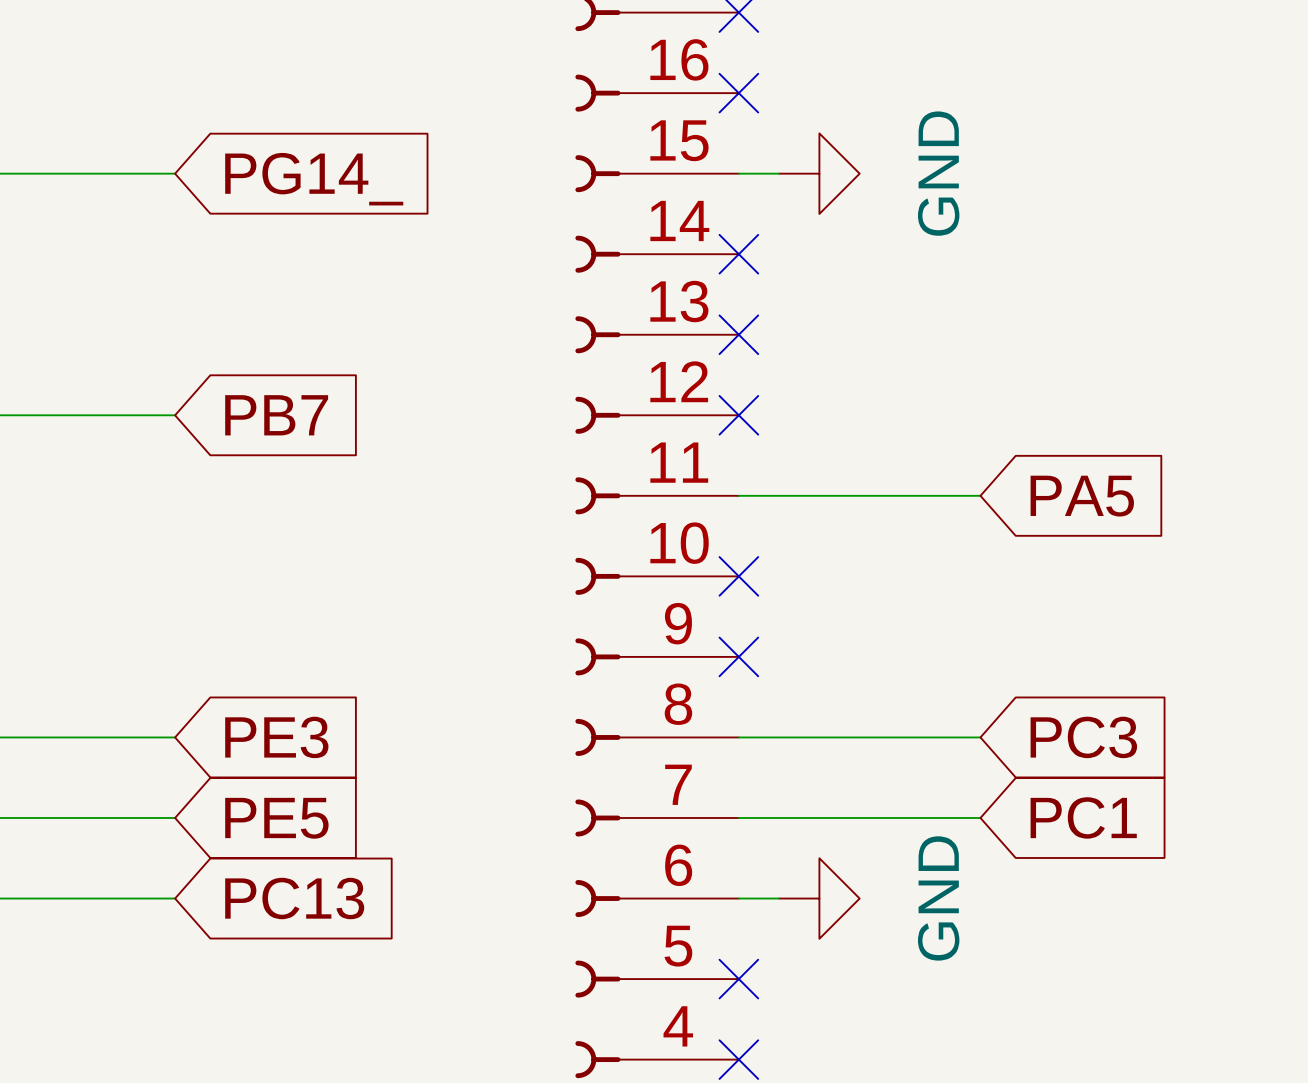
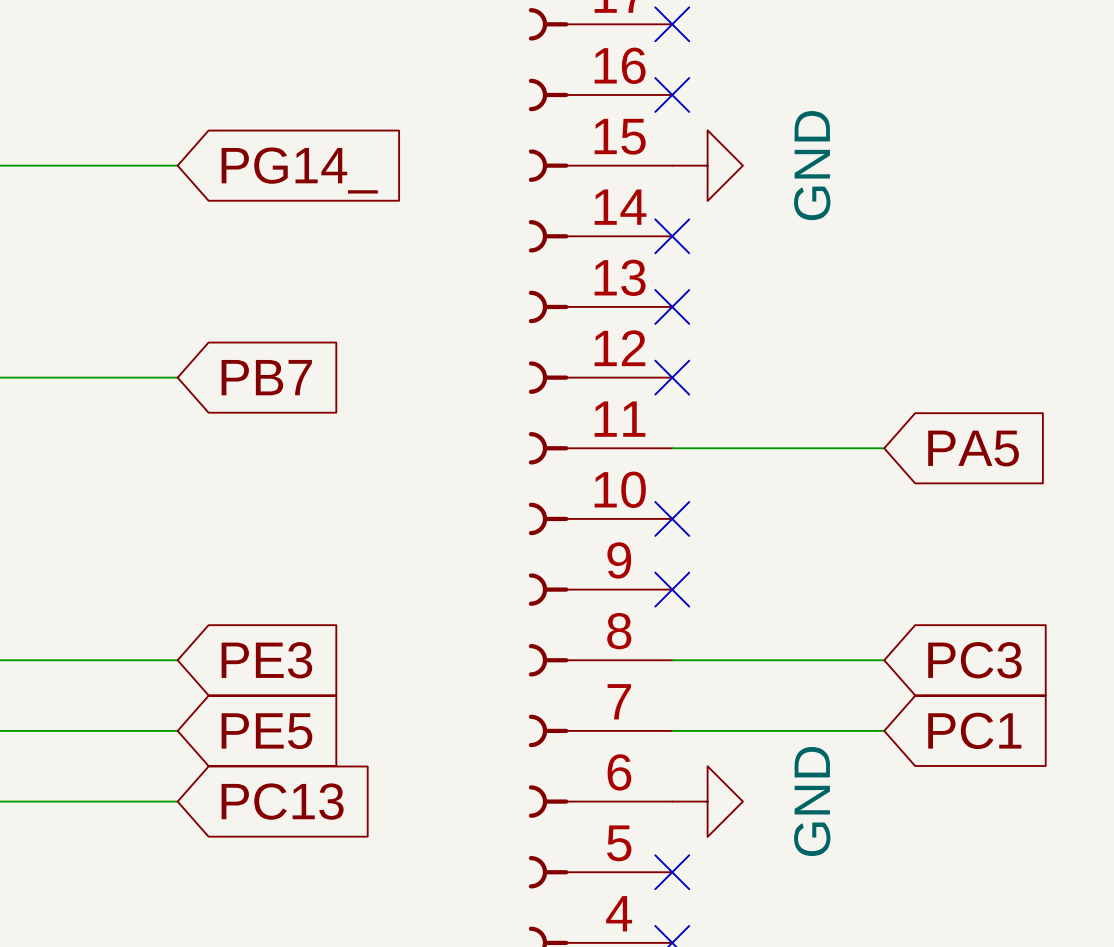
power symbol position: GND (819, 173) -> GND (707, 165)
power symbol position: GND (819, 898) -> GND (707, 801)

